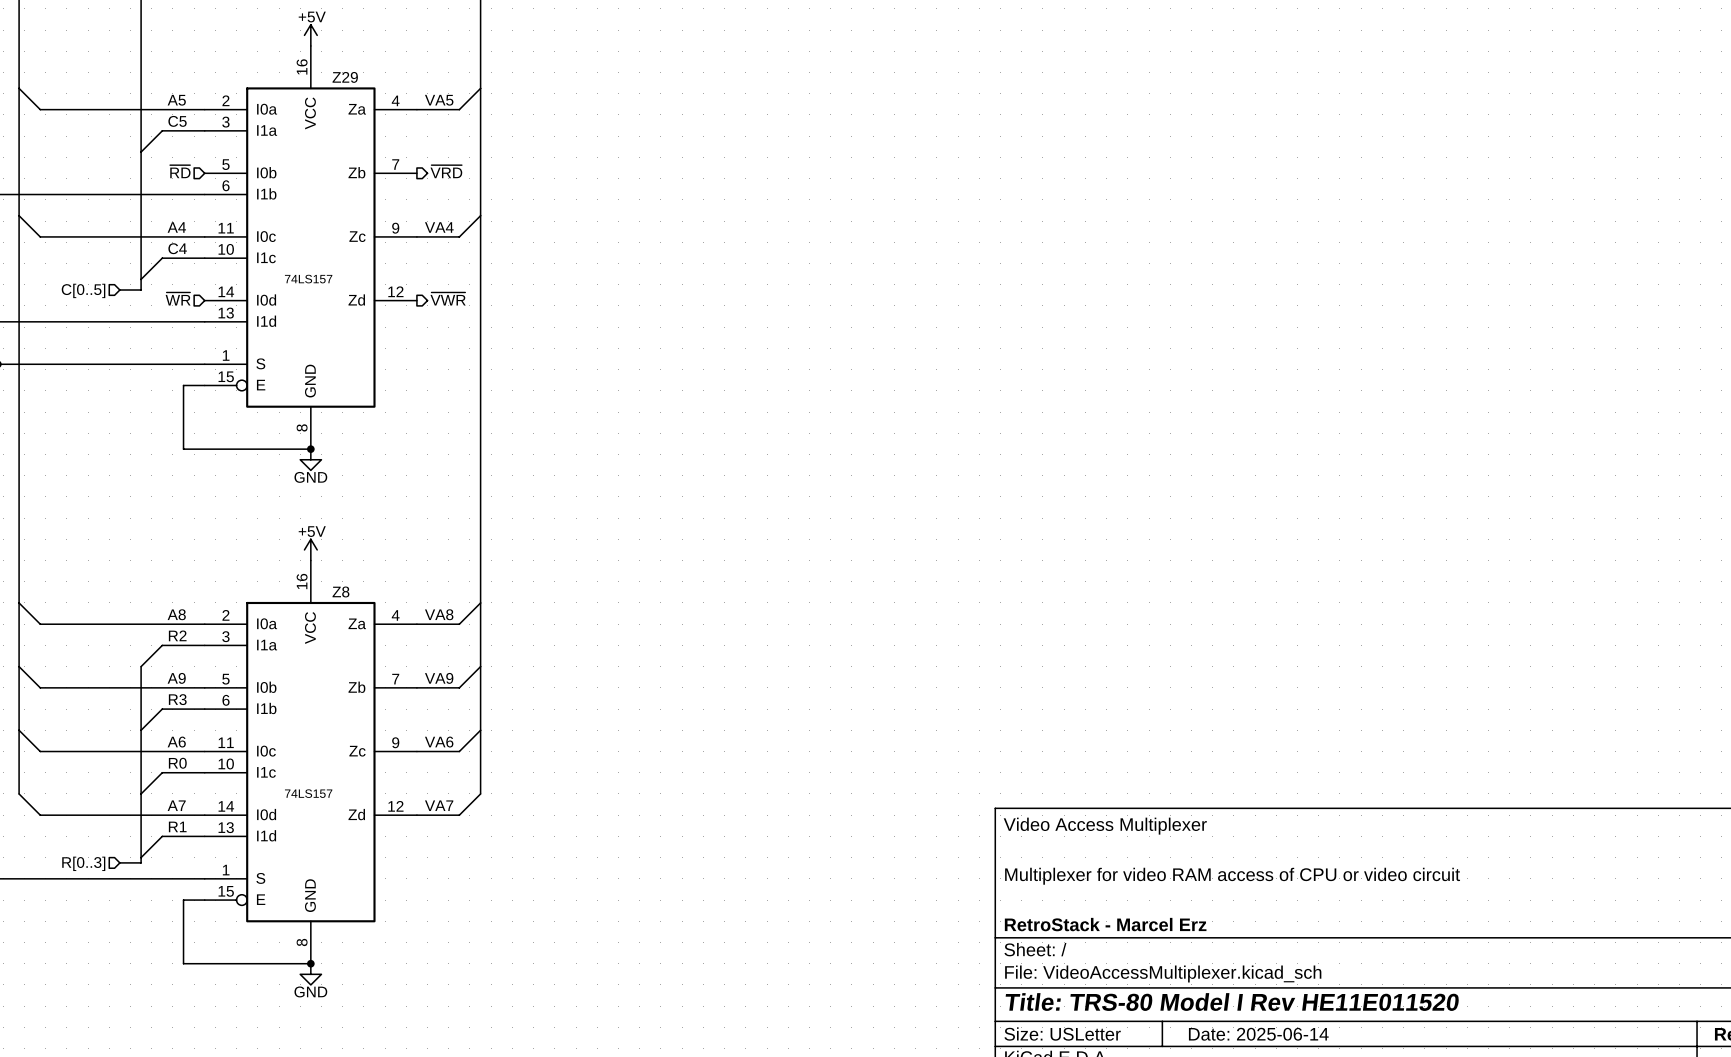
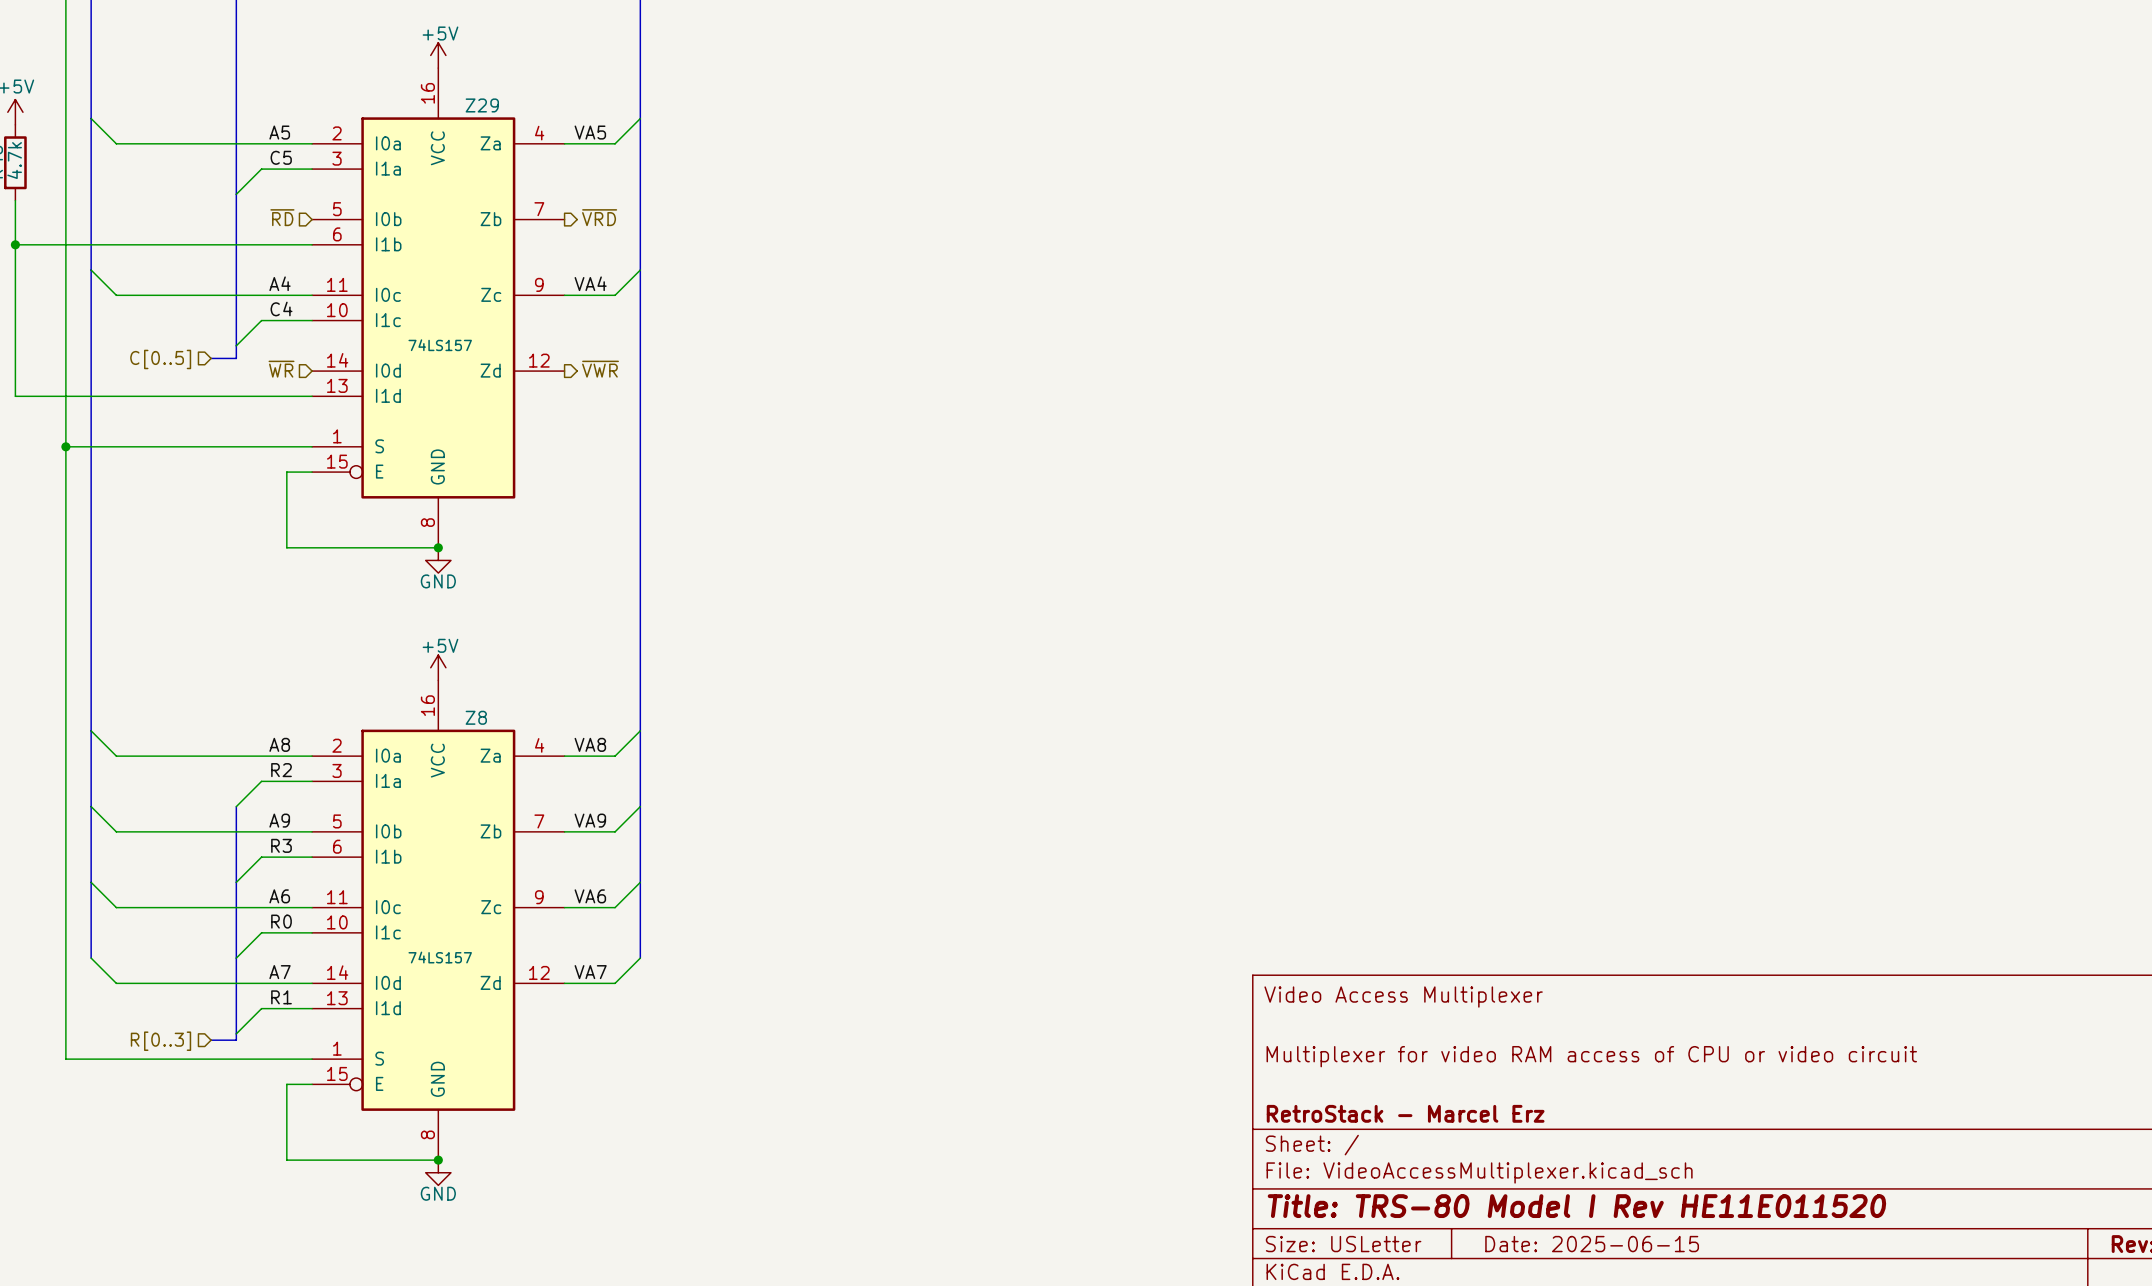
title block: Date: 2025-06-14 (1258, 1034) -> Date: 2025-06-15 (1592, 1244)

